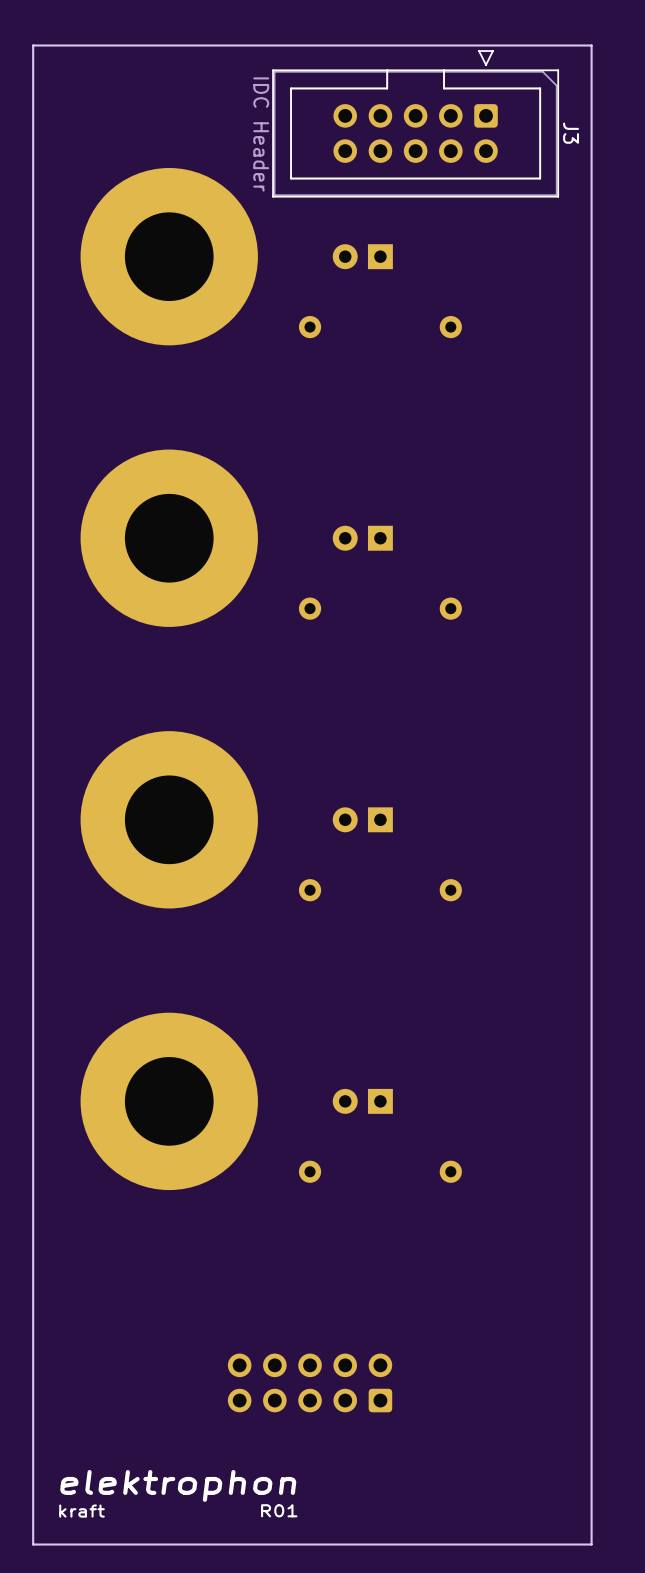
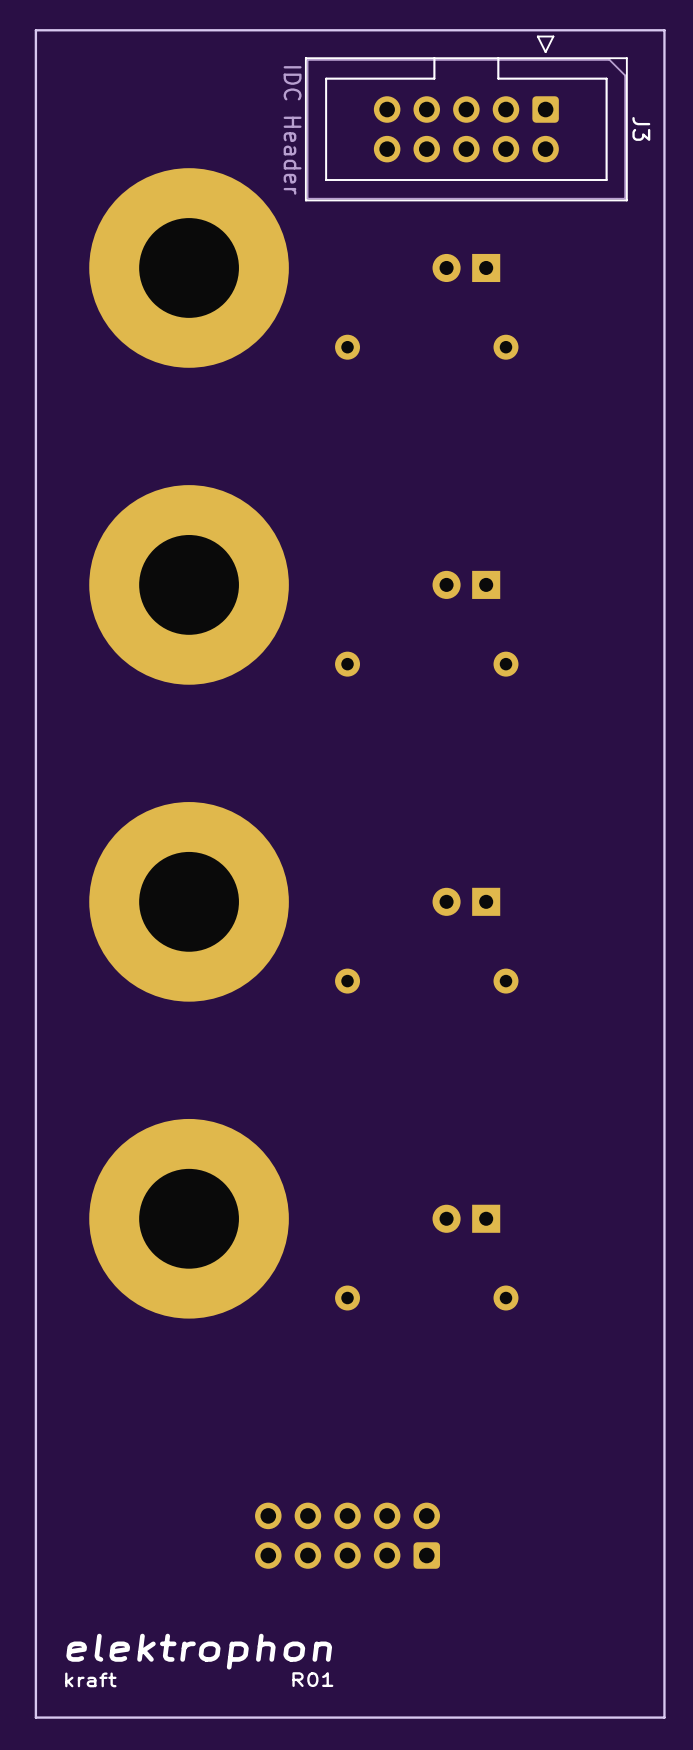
part position: (362, 256) -> (466, 267)
part position: (362, 538) -> (466, 584)
part position: (362, 819) -> (466, 901)
part position: (362, 1101) -> (466, 1218)

